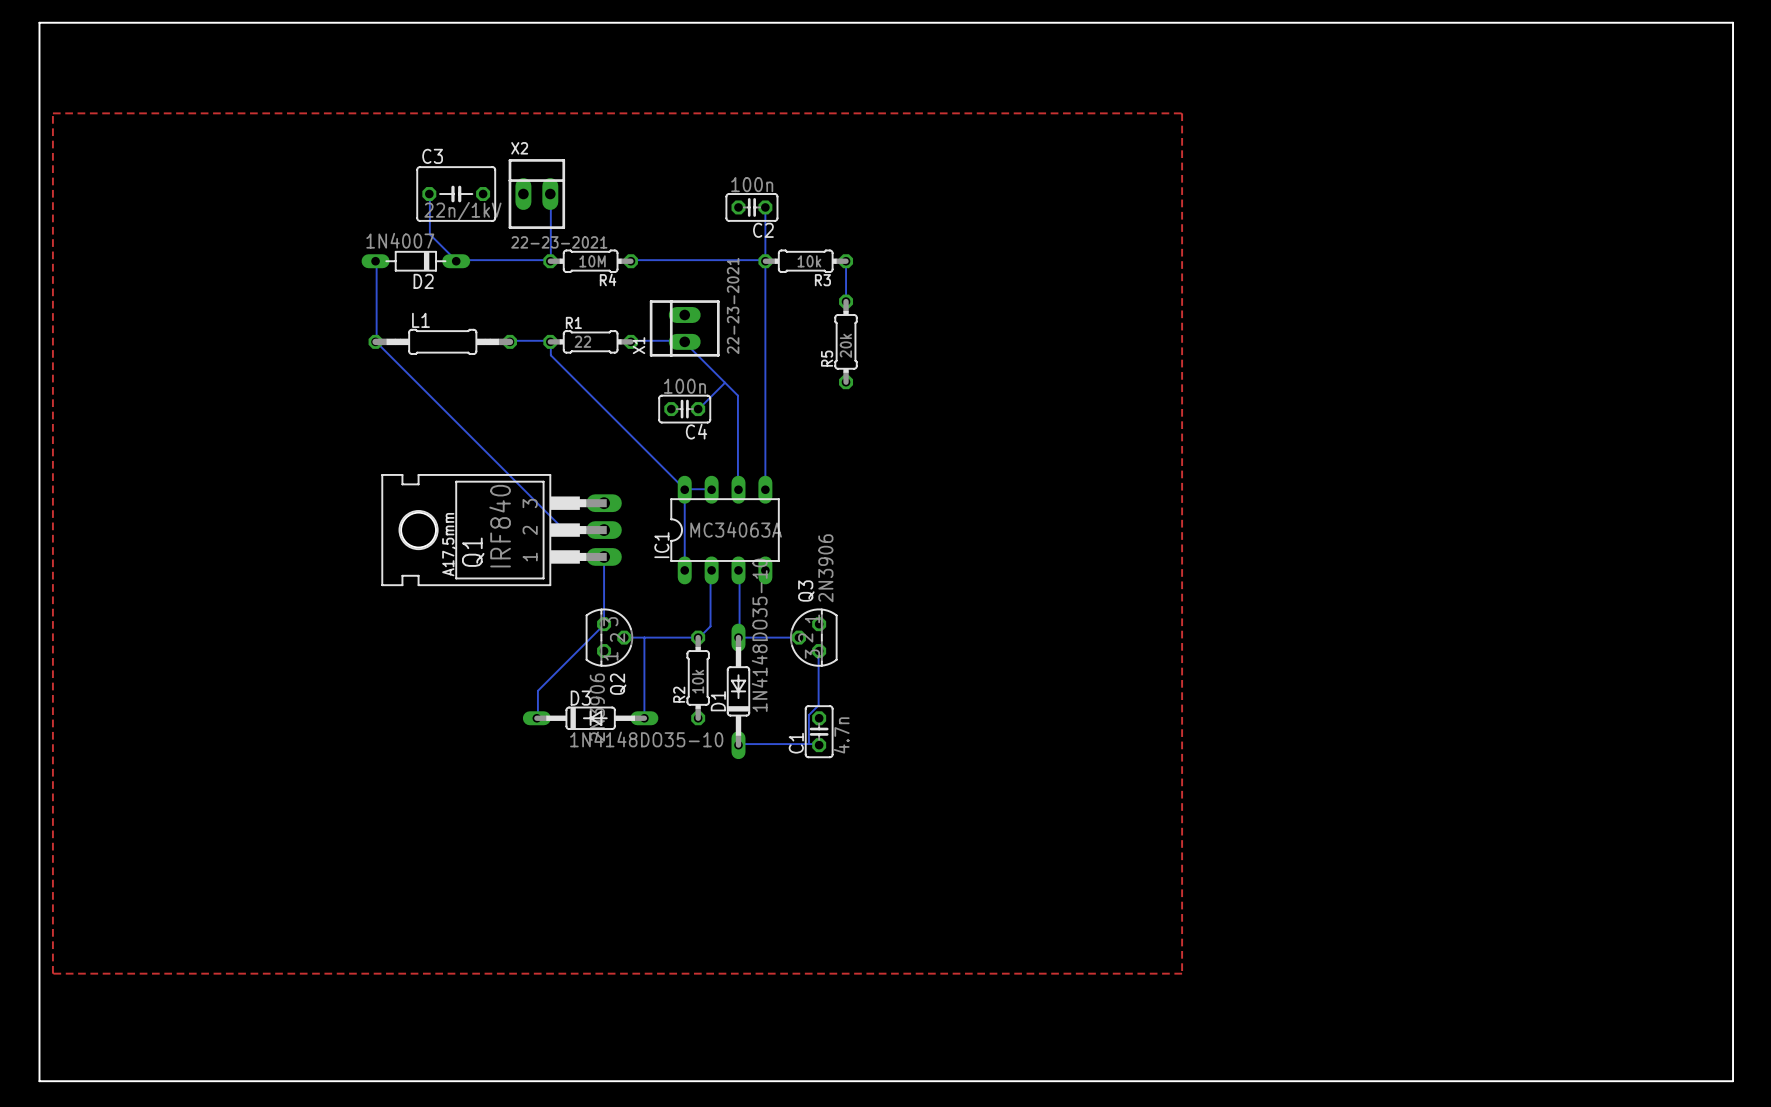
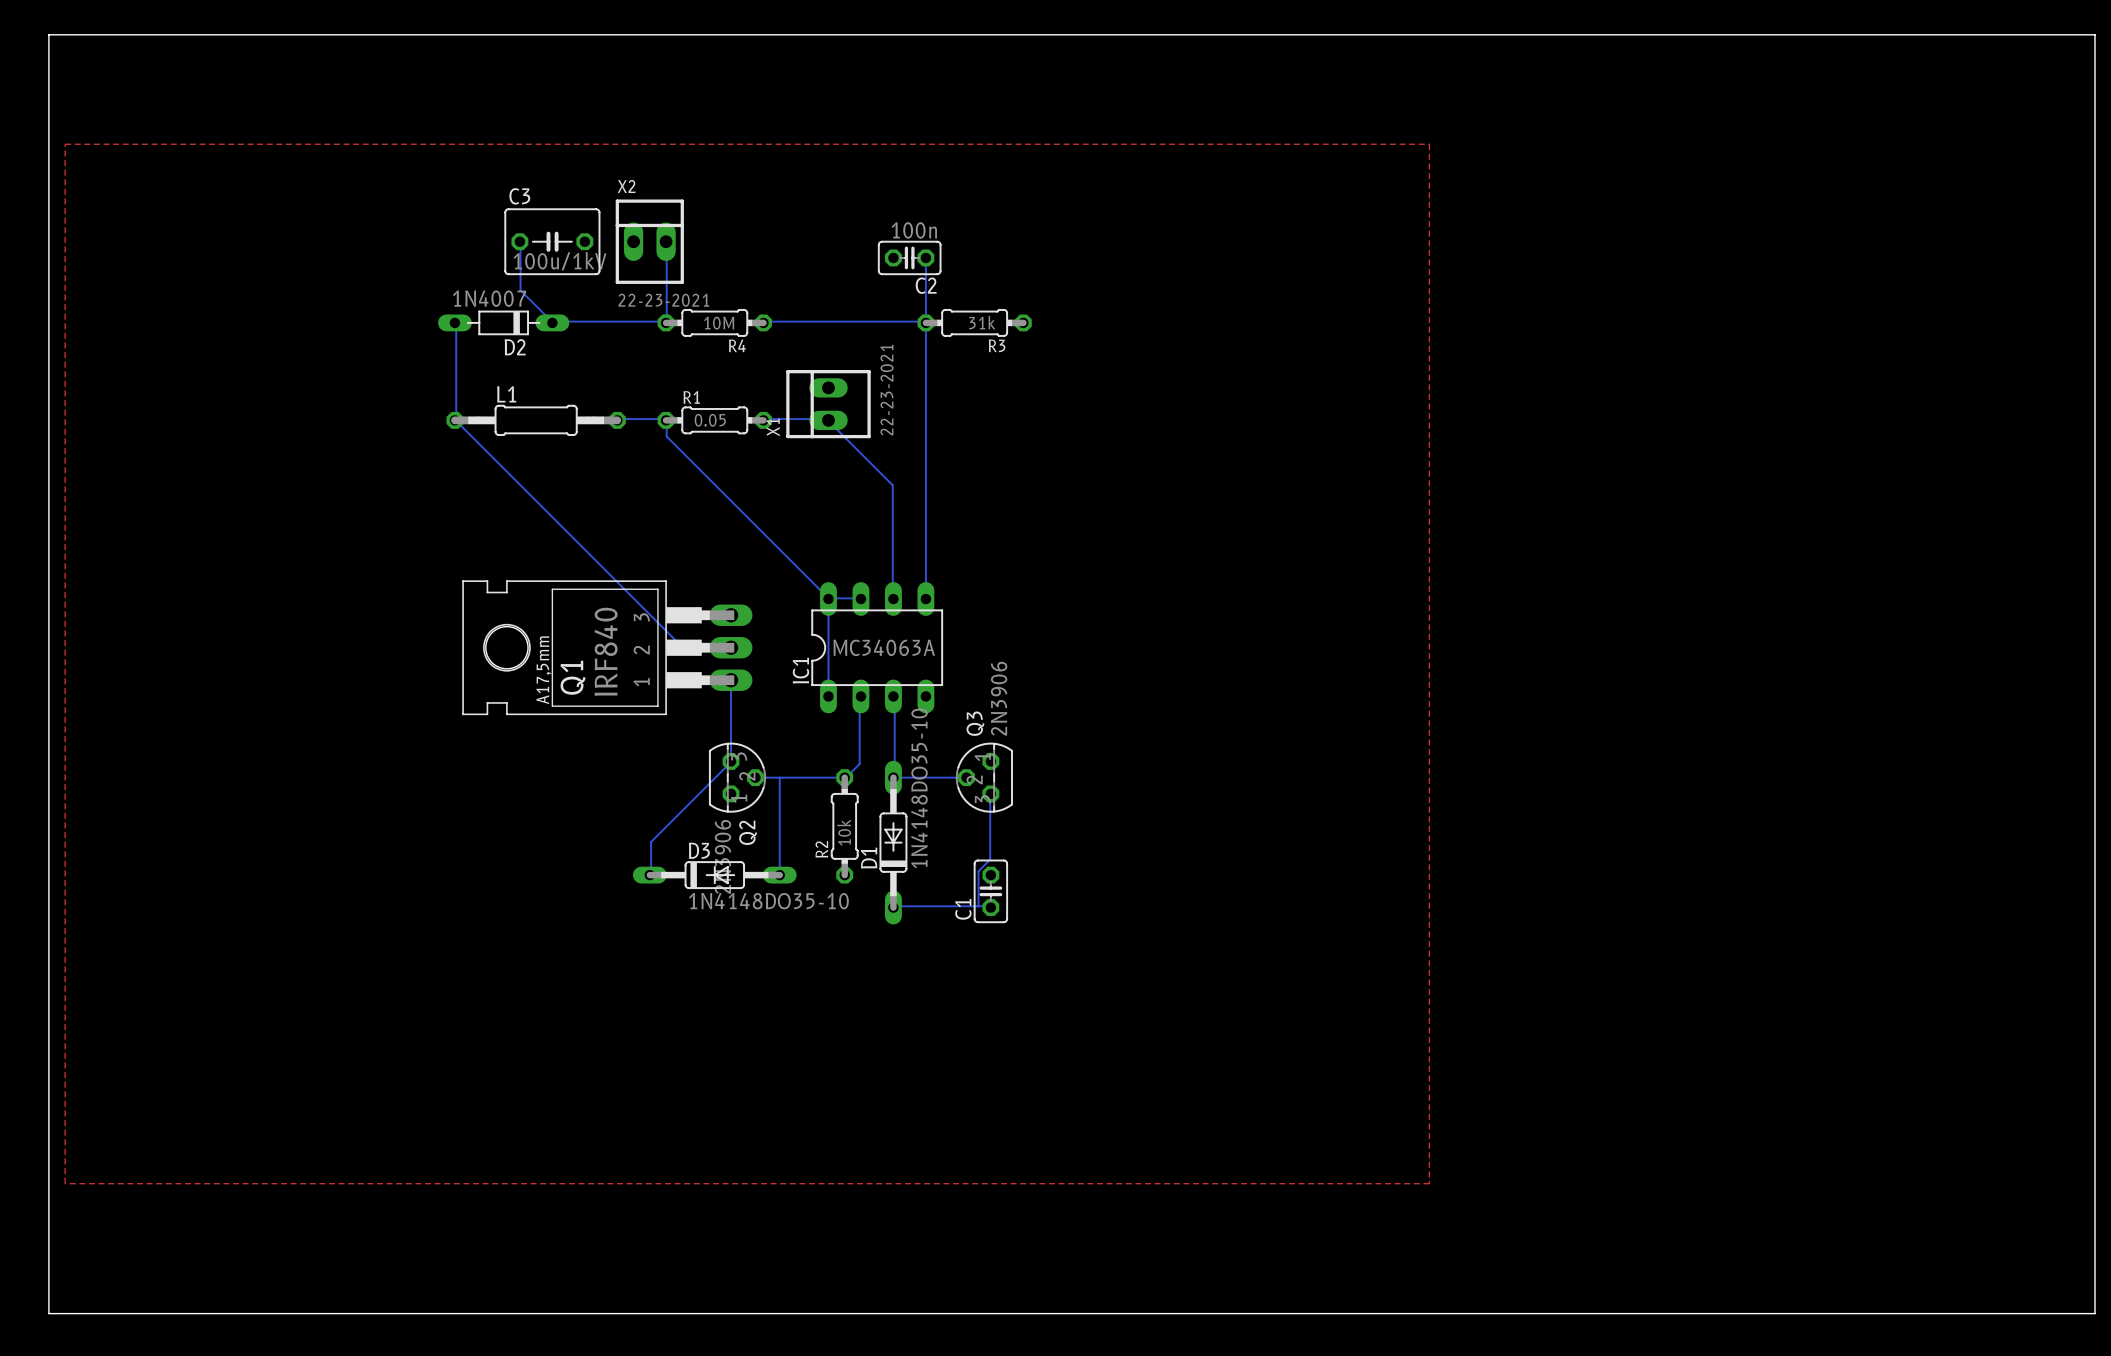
C3 value: 22n/1kV (462, 211) -> 100u/1kV (560, 261)
R3 value: 10k (809, 261) -> 31k (982, 322)
bottom track: (846, 261) (846, 301) -> none
R1 value: 22 (582, 341) -> 0.05 (710, 420)
R5: 20k (846, 341) -> none
bottom track: (725, 382) (698, 409) -> none
C4: 100n (684, 409) -> none
C1 value: 4.7n (841, 735) -> none

